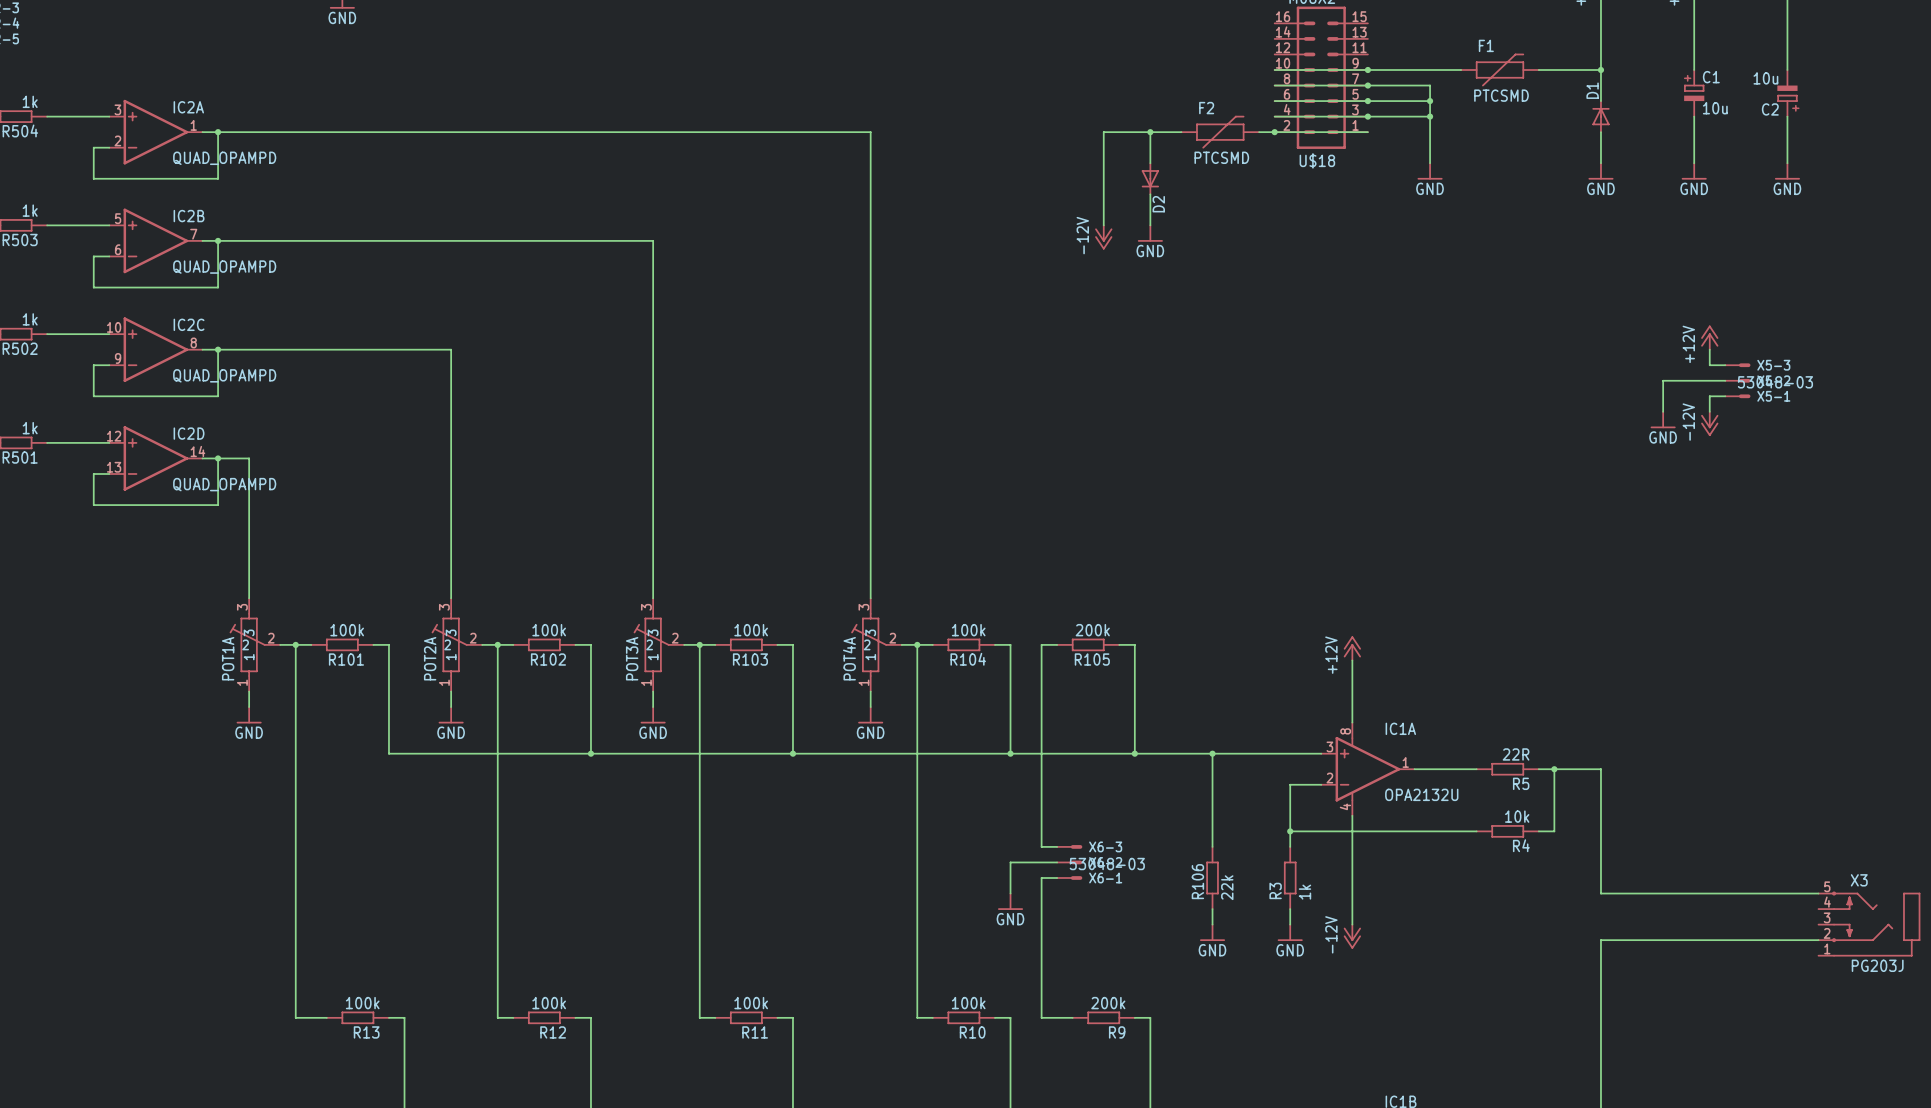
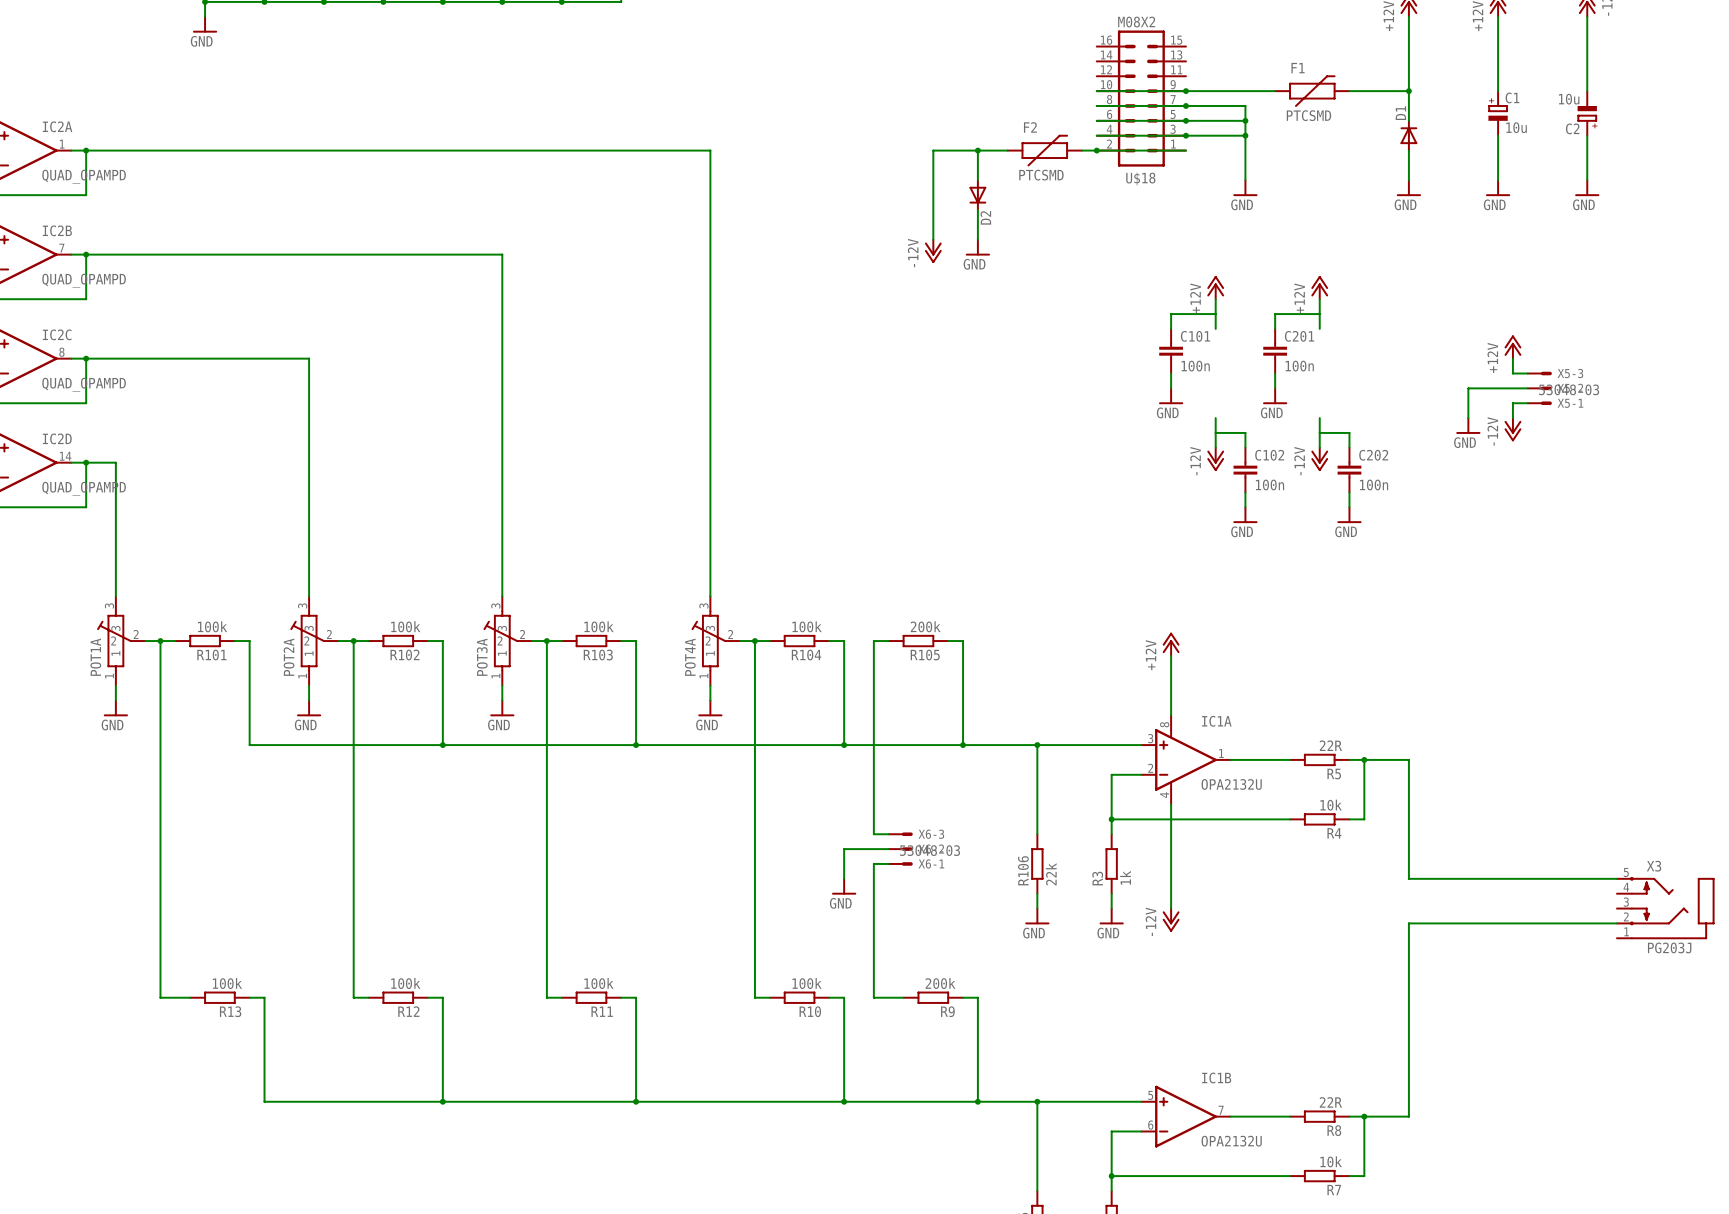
power symbol: none -> +12V (1215, 287)
power symbol: none -> +12V (1319, 287)
wire: none -> (1215, 299) (1215, 328)
wire: none -> (1319, 299) (1319, 328)
wire: none -> (1215, 314) (1171, 314) (1171, 328)
wire: none -> (1319, 314) (1275, 314) (1275, 328)
C101: none -> 100n (1171, 351)
C201: none -> 100n (1275, 351)
wire: none -> (1171, 373) (1171, 388)
wire: none -> (1275, 373) (1275, 388)
power symbol: none -> GND (1171, 396)
power symbol: none -> GND (1275, 396)
wire: none -> (1215, 418) (1215, 447)
wire: none -> (1319, 418) (1319, 447)
wire: none -> (1215, 432) (1245, 432) (1245, 447)
wire: none -> (1319, 432) (1349, 432) (1349, 447)
power symbol: none -> -12V (1215, 459)
power symbol: none -> -12V (1319, 459)
C102: none -> 100n (1245, 470)
C202: none -> 100n (1349, 470)
wire: none -> (1245, 492) (1245, 507)
wire: none -> (1349, 492) (1349, 507)
power symbol: none -> GND (1245, 515)
power symbol: none -> GND (1349, 515)

